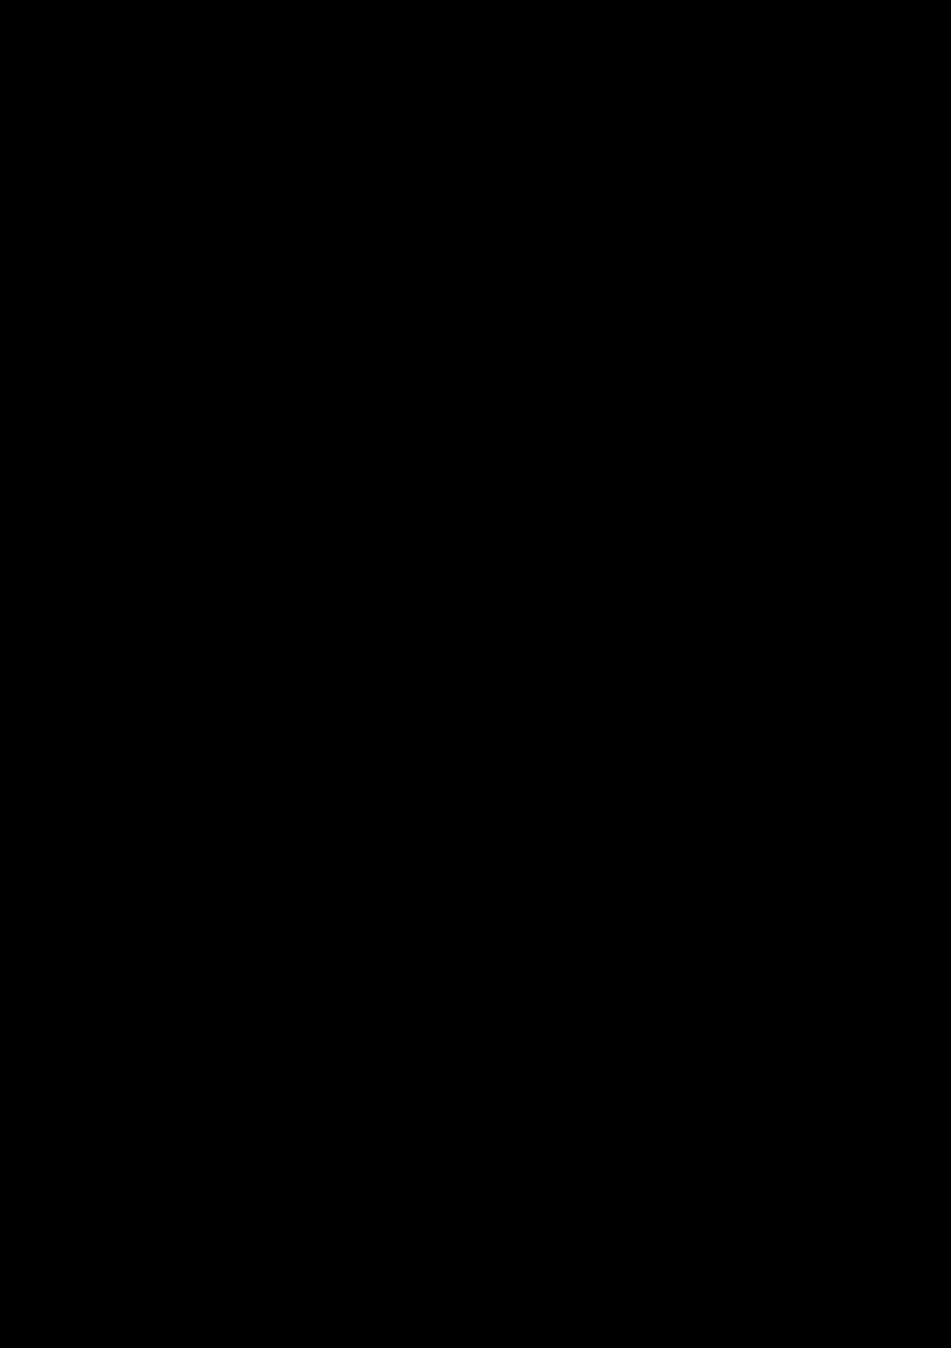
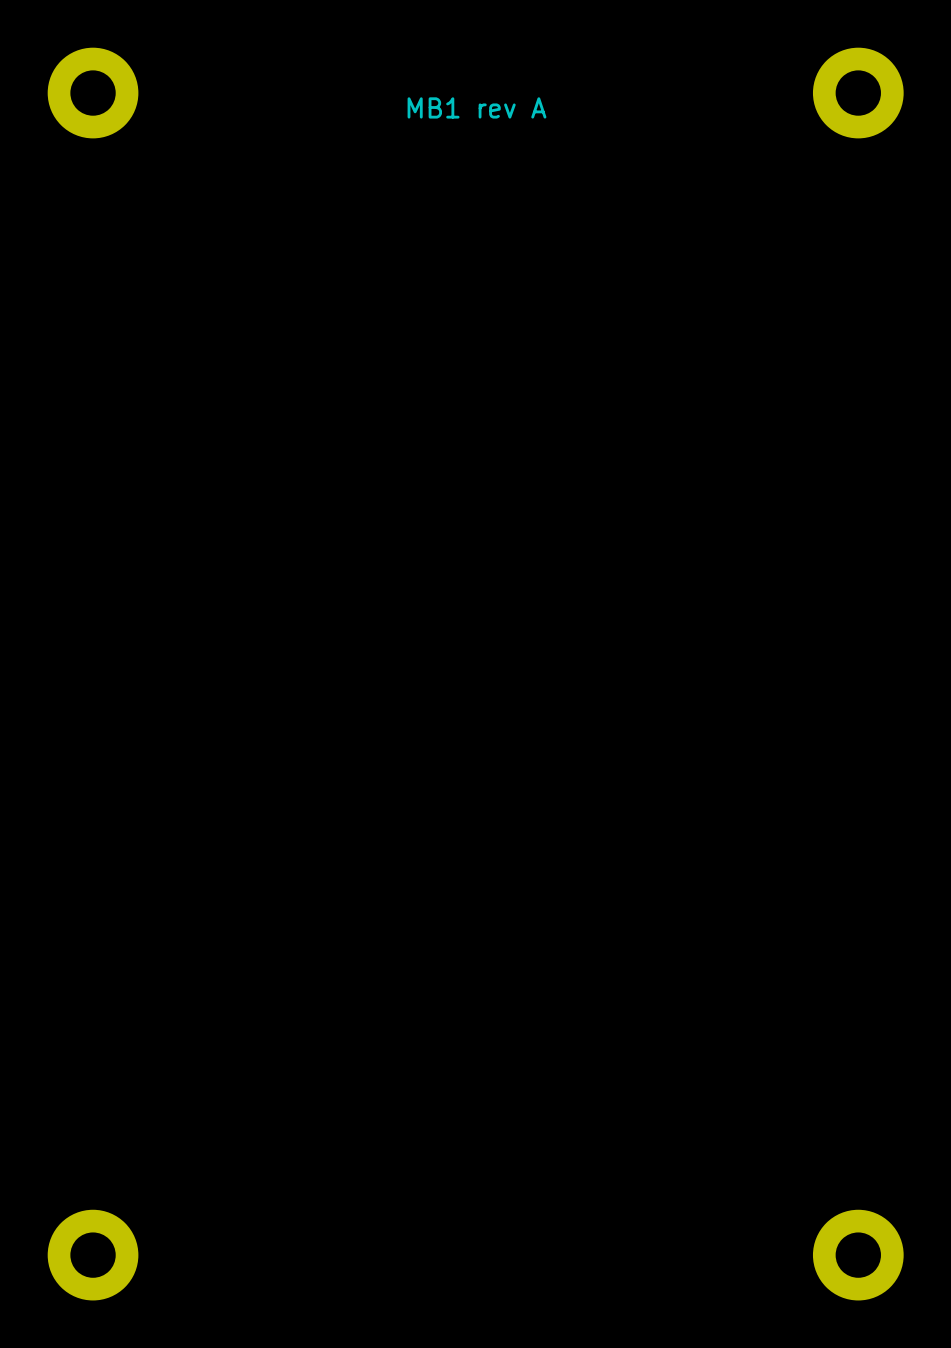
part: none -> (93, 93)
part: none -> (858, 93)
text: none -> MB1 rev A (476, 107)
part: none -> (93, 1255)
part: none -> (858, 1255)

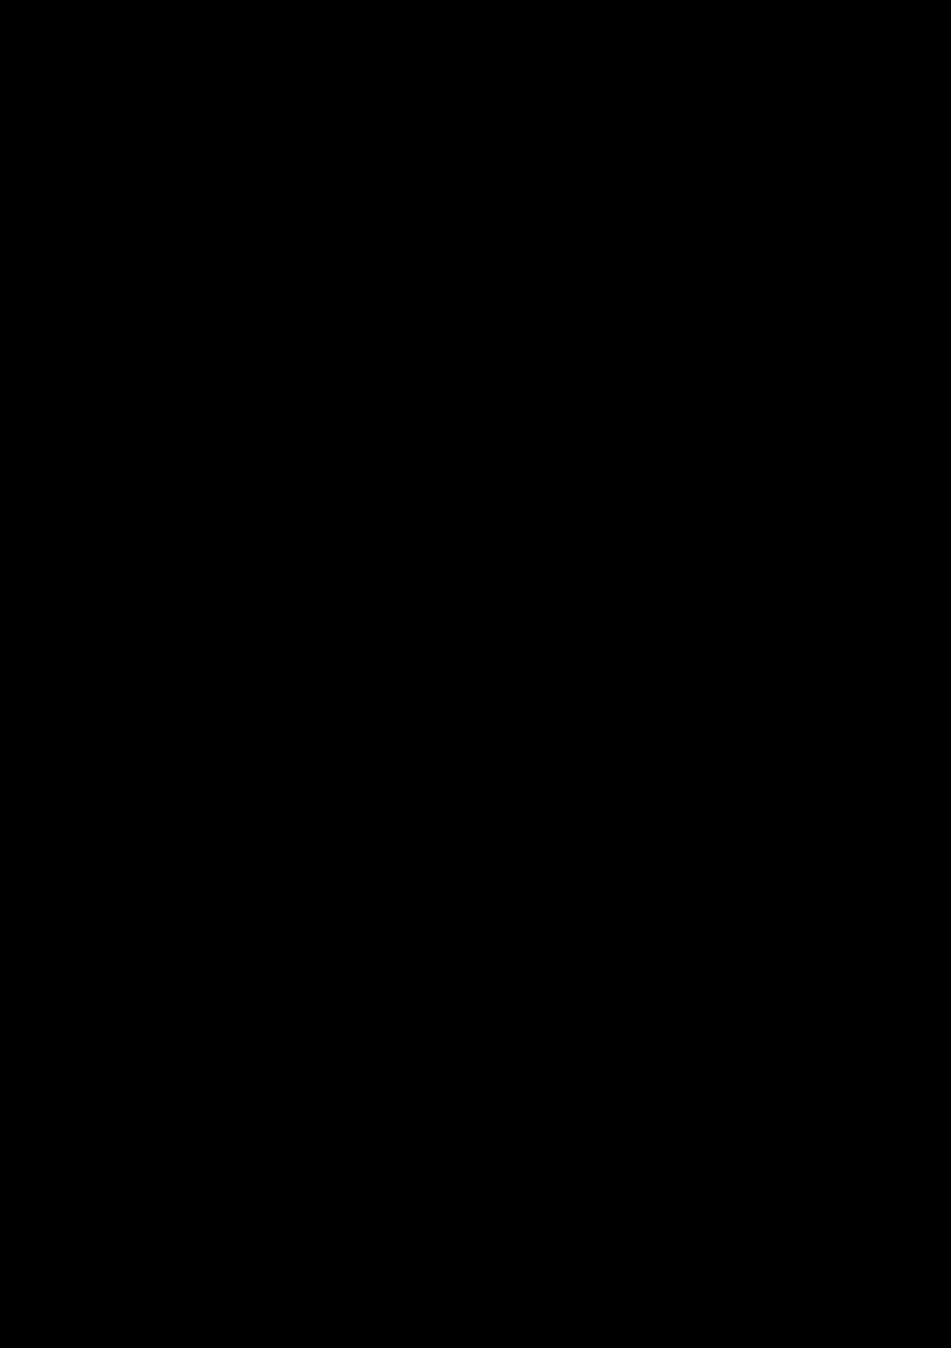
part: (93, 93) -> none
part: (858, 93) -> none
text: MB1 rev A (476, 107) -> none
part: (93, 1255) -> none
part: (858, 1255) -> none

